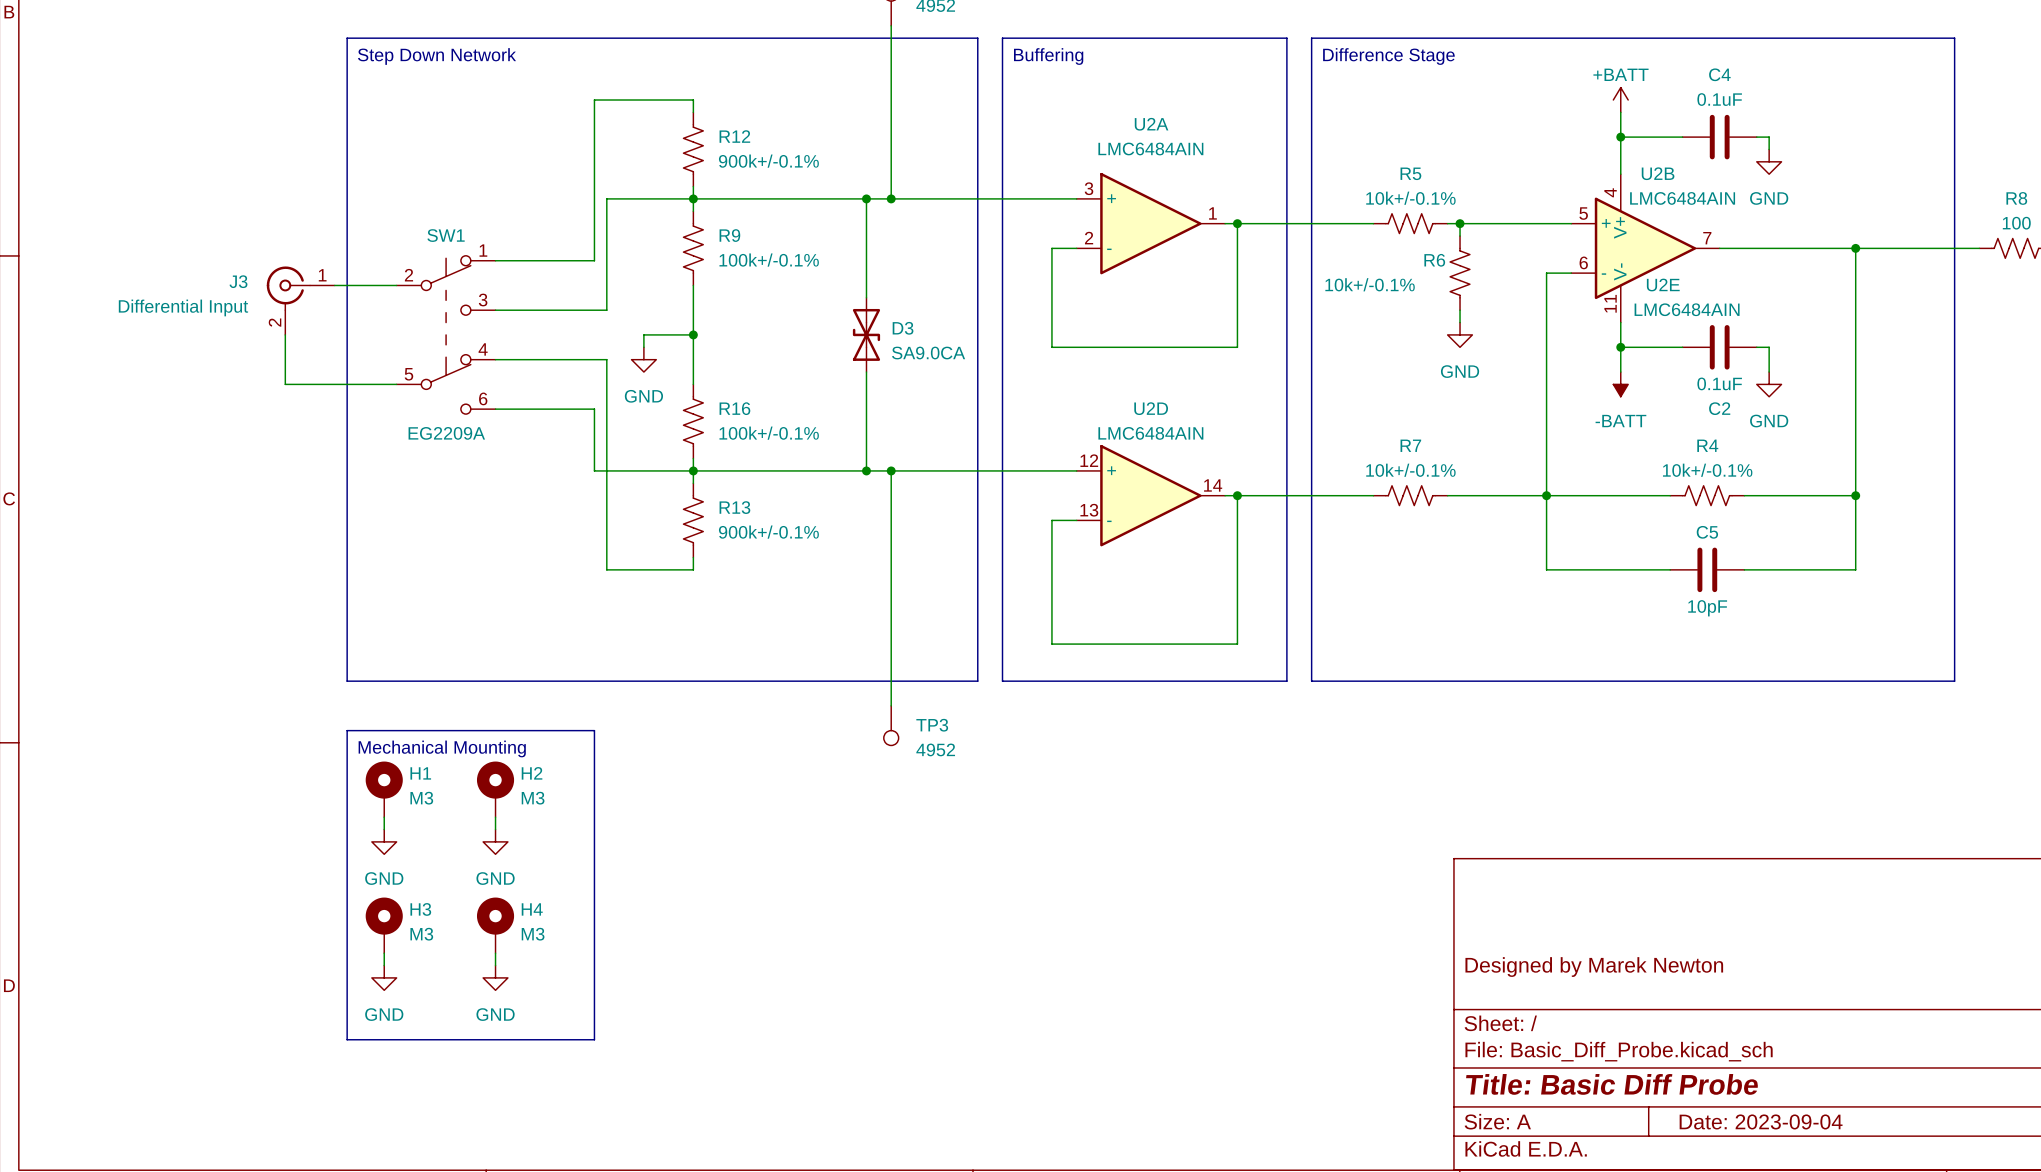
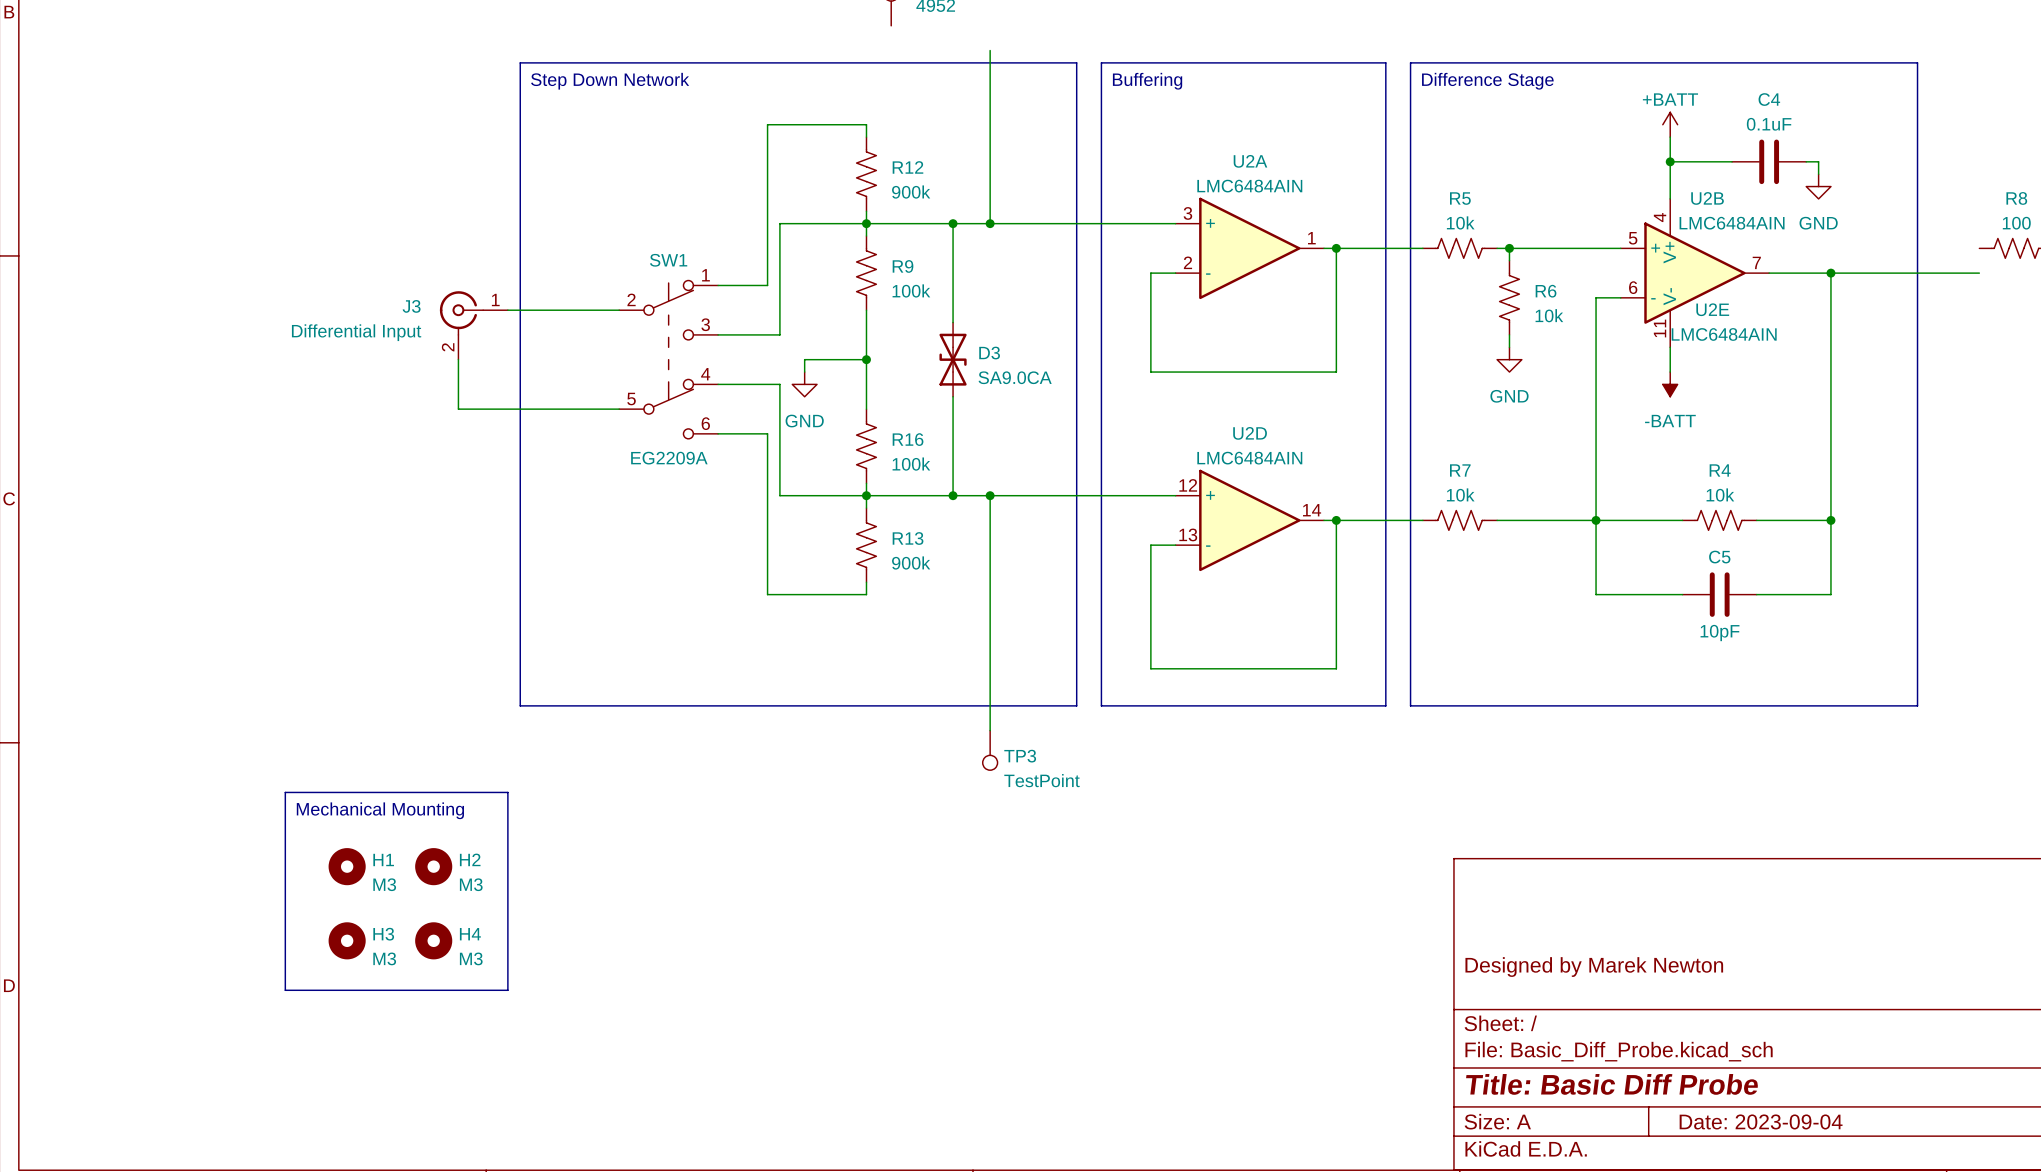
wire: (891, 25) (891, 198) -> (990, 50) (990, 223)
line: (347, 38) (977, 38) (977, 681) (347, 681) (347, 38) -> (520, 62) (520, 705) (1076, 705) (1076, 62) (520, 62)
line: (1002, 38) (1286, 38) (1286, 681) (1002, 681) (1002, 38) -> (1101, 62) (1385, 62) (1385, 705) (1101, 705) (1101, 62)
line: (1311, 38) (1954, 38) (1954, 681) (1311, 681) (1311, 38) -> (1410, 62) (1410, 705) (1917, 705) (1917, 62) (1410, 62)
text position: Step Down Network (437, 56) -> Step Down Network (610, 81)
text position: Buffering (1048, 56) -> Buffering (1147, 81)
text position: Difference Stage (1388, 56) -> Difference Stage (1487, 81)
power symbol position: +BATT (1620, 100) -> +BATT (1670, 124)
wire: (693, 112) (693, 100) (594, 100) (594, 260) (495, 260) -> none
wire: (1620, 112) (1620, 174) -> (1670, 137) (1670, 198)
U2A name position: U2A (1151, 124) -> U2A (1250, 161)
R12 name position: R12 (734, 136) -> R12 (907, 167)
wire: none -> (866, 137) (866, 124) (767, 124) (767, 285) (718, 285)
wire: (1620, 137) (1682, 137) -> (1670, 161) (1732, 161)
junction position: (1620, 137) -> (1670, 161)
C4 position: (1719, 137) -> (1769, 161)
wire: (1756, 137) (1769, 137) (1769, 149) -> (1806, 161) (1818, 161) (1818, 174)
U2A value position: LMC6484AIN (1150, 148) -> LMC6484AIN (1249, 186)
R12 position: (693, 149) -> (866, 174)
R12 value: 900k+/-0.1% (768, 161) -> 900k (911, 192)
power symbol position: GND (1769, 161) -> GND (1818, 186)
wire: (693, 186) (693, 211) -> none
junction: (693, 198) -> none
junction: (866, 198) -> none
junction: (891, 198) -> none
wire: (1076, 198) (606, 198) (606, 310) -> (619, 310) (606, 310)
R5 value: 10k+/-0.1% (1410, 198) -> 10k (1460, 222)
junction: none -> (866, 223)
wire: none -> (953, 223) (953, 322)
junction: none -> (953, 223)
junction: none -> (990, 223)
U2A position: (1150, 223) -> (1249, 248)
wire: none -> (1175, 223) (779, 223) (779, 334) (718, 334)
wire: (1225, 223) (1373, 223) -> none
wire: (1237, 223) (1237, 347) (1051, 347) (1051, 248) (1076, 248) -> (1336, 248) (1336, 372) (1150, 372) (1150, 273) (1175, 273)
junction: (1237, 223) -> none
R5 position: (1410, 223) -> (1460, 248)
wire: (1447, 223) (1571, 223) -> (1497, 248) (1620, 248)
wire: (1460, 223) (1460, 236) -> (1509, 248) (1509, 260)
junction position: (1460, 223) -> (1509, 248)
R9 name position: R9 (729, 235) -> R9 (903, 266)
R9 position: (693, 248) -> (866, 273)
wire: none -> (1323, 248) (1422, 248)
junction: none -> (1336, 248)
U2E position: (1620, 248) -> (1670, 273)
U2B position: (1645, 248) -> (1694, 273)
wire: (1719, 248) (1979, 248) -> none
wire: (1855, 248) (1855, 569) (1744, 569) -> none
junction position: (1855, 248) -> (1830, 273)
R9 value: 100k+/-0.1% (769, 260) -> 100k (911, 290)
R6 name position: R6 (1434, 260) -> R6 (1546, 291)
R6 position: (1460, 273) -> (1509, 297)
wire: (1571, 273) (1546, 273) (1546, 569) (1670, 569) -> none
wire: none -> (1769, 273) (1979, 273)
wire: none -> (1830, 273) (1830, 594) (1756, 594)
R6 value: 10k+/-0.1% (1370, 284) -> 10k (1549, 315)
wire: (334, 285) (396, 285) -> none
wire: (693, 285) (693, 384) -> none
wire: none -> (1620, 297) (1596, 297) (1596, 594) (1682, 594)
J3 position: (300, 300) -> (473, 325)
U2E value position: LMC6484AIN (1687, 309) -> LMC6484AIN (1724, 334)
wire: (1460, 310) (1460, 322) -> (1509, 334) (1509, 347)
wire: (1620, 322) (1620, 372) -> none
wire: (285, 334) (285, 384) (396, 384) -> none
SW1 position: (446, 334) -> (668, 359)
wire: (693, 334) (643, 334) (643, 347) -> none
junction: (693, 334) -> none
D3 position: (866, 334) -> (953, 359)
power symbol position: GND (1460, 334) -> GND (1509, 359)
wire: (1620, 347) (1682, 347) -> none
junction: (1620, 347) -> none
wire: none -> (1670, 347) (1670, 372)
C2: 0.1uF (1719, 347) -> none
wire: (1756, 347) (1769, 347) (1769, 372) -> none
wire: none -> (458, 359) (458, 409) (495, 409)
wire: (495, 359) (606, 359) (606, 569) (693, 569) (693, 557) -> none
power symbol position: GND (643, 359) -> GND (804, 384)
wire: none -> (866, 359) (804, 359) (804, 372)
junction: none -> (866, 359)
wire: none -> (718, 384) (779, 384) (779, 495) (1175, 495)
power symbol position: -BATT (1620, 384) -> -BATT (1670, 384)
power symbol: GND (1769, 384) -> none
wire: none -> (953, 396) (953, 495)
R16 name position: R16 (734, 408) -> R16 (908, 439)
wire: (594, 409) (594, 470) (1076, 470) -> (594, 409) (619, 409)
wire: (866, 409) (866, 470) -> none
R16 position: (693, 421) -> (866, 446)
wire: none -> (718, 433) (767, 433) (767, 594) (866, 594) (866, 582)
R16 value: 100k+/-0.1% (769, 433) -> 100k (911, 464)
wire: (693, 458) (693, 483) -> (866, 483) (866, 508)
junction: (693, 470) -> none
junction: (866, 470) -> none
wire: (891, 470) (891, 705) -> (990, 495) (990, 730)
junction: (891, 470) -> none
R7 value: 10k+/-0.1% (1410, 470) -> 10k (1460, 494)
R4 value: 10k+/-0.1% (1707, 470) -> 10k (1720, 494)
junction: none -> (866, 495)
junction: none -> (953, 495)
junction: none -> (990, 495)
U2D position: (1150, 495) -> (1249, 520)
wire: (1225, 495) (1373, 495) -> none
wire: (1237, 495) (1237, 644) (1051, 644) (1051, 520) (1076, 520) -> (1336, 520) (1336, 668) (1150, 668) (1150, 545) (1175, 545)
junction: (1237, 495) -> none
R7 position: (1410, 495) -> (1460, 520)
wire: (1447, 495) (1670, 495) -> none
junction position: (1546, 495) -> (1596, 520)
R4 position: (1707, 495) -> (1719, 520)
wire: (1744, 495) (1855, 495) -> none
junction position: (1855, 495) -> (1830, 520)
R13 name position: R13 (734, 507) -> R13 (908, 538)
R13 position: (693, 520) -> (866, 545)
wire: none -> (1323, 520) (1422, 520)
junction: none -> (1336, 520)
wire: none -> (1497, 520) (1682, 520)
wire: none -> (1756, 520) (1830, 520)
R13 value: 900k+/-0.1% (768, 532) -> 900k (911, 562)
C5 position: (1707, 569) -> (1719, 594)
TP3 position: (891, 725) -> (990, 750)
TP3 name position: TP3 (932, 725) -> TP3 (1020, 756)
line: (347, 730) (347, 1039) (594, 1039) (594, 730) (347, 730) -> none
text position: Mechanical Mounting (442, 748) -> Mechanical Mounting (380, 810)
TP3 value: 4952 (935, 749) -> TestPoint (1041, 780)
H1 symbol: [365, 761, 403, 818] -> [328, 848, 366, 886]
H2 symbol: [476, 761, 515, 818] -> [415, 848, 453, 886]
line: none -> (285, 792) (507, 792) (507, 990) (285, 990) (285, 792)
wire: (384, 817) (384, 829) -> none
wire: (495, 817) (495, 829) -> none
power symbol: GND (384, 841) -> none
power symbol: GND (495, 841) -> none
H3 symbol: [365, 897, 403, 954] -> [328, 922, 366, 960]
H4 symbol: [476, 897, 515, 954] -> [415, 922, 453, 960]
wire: (495, 953) (495, 965) -> none
power symbol: GND (384, 977) -> none
power symbol: GND (495, 977) -> none

